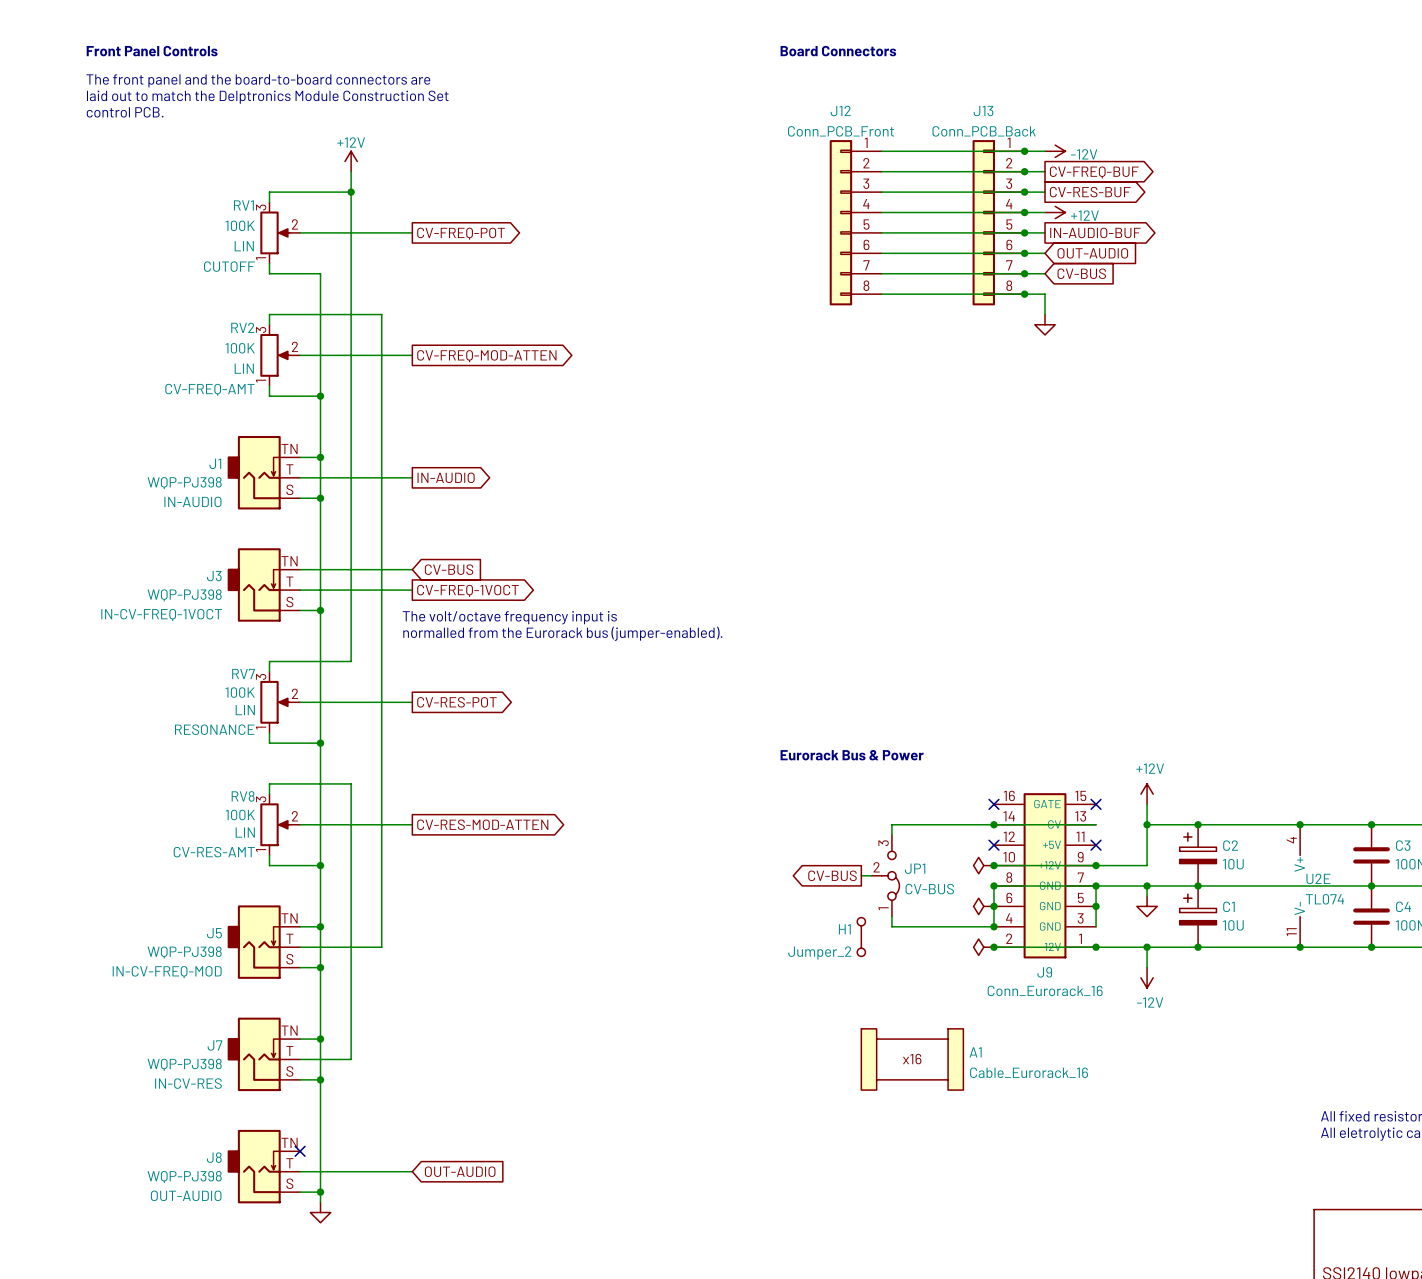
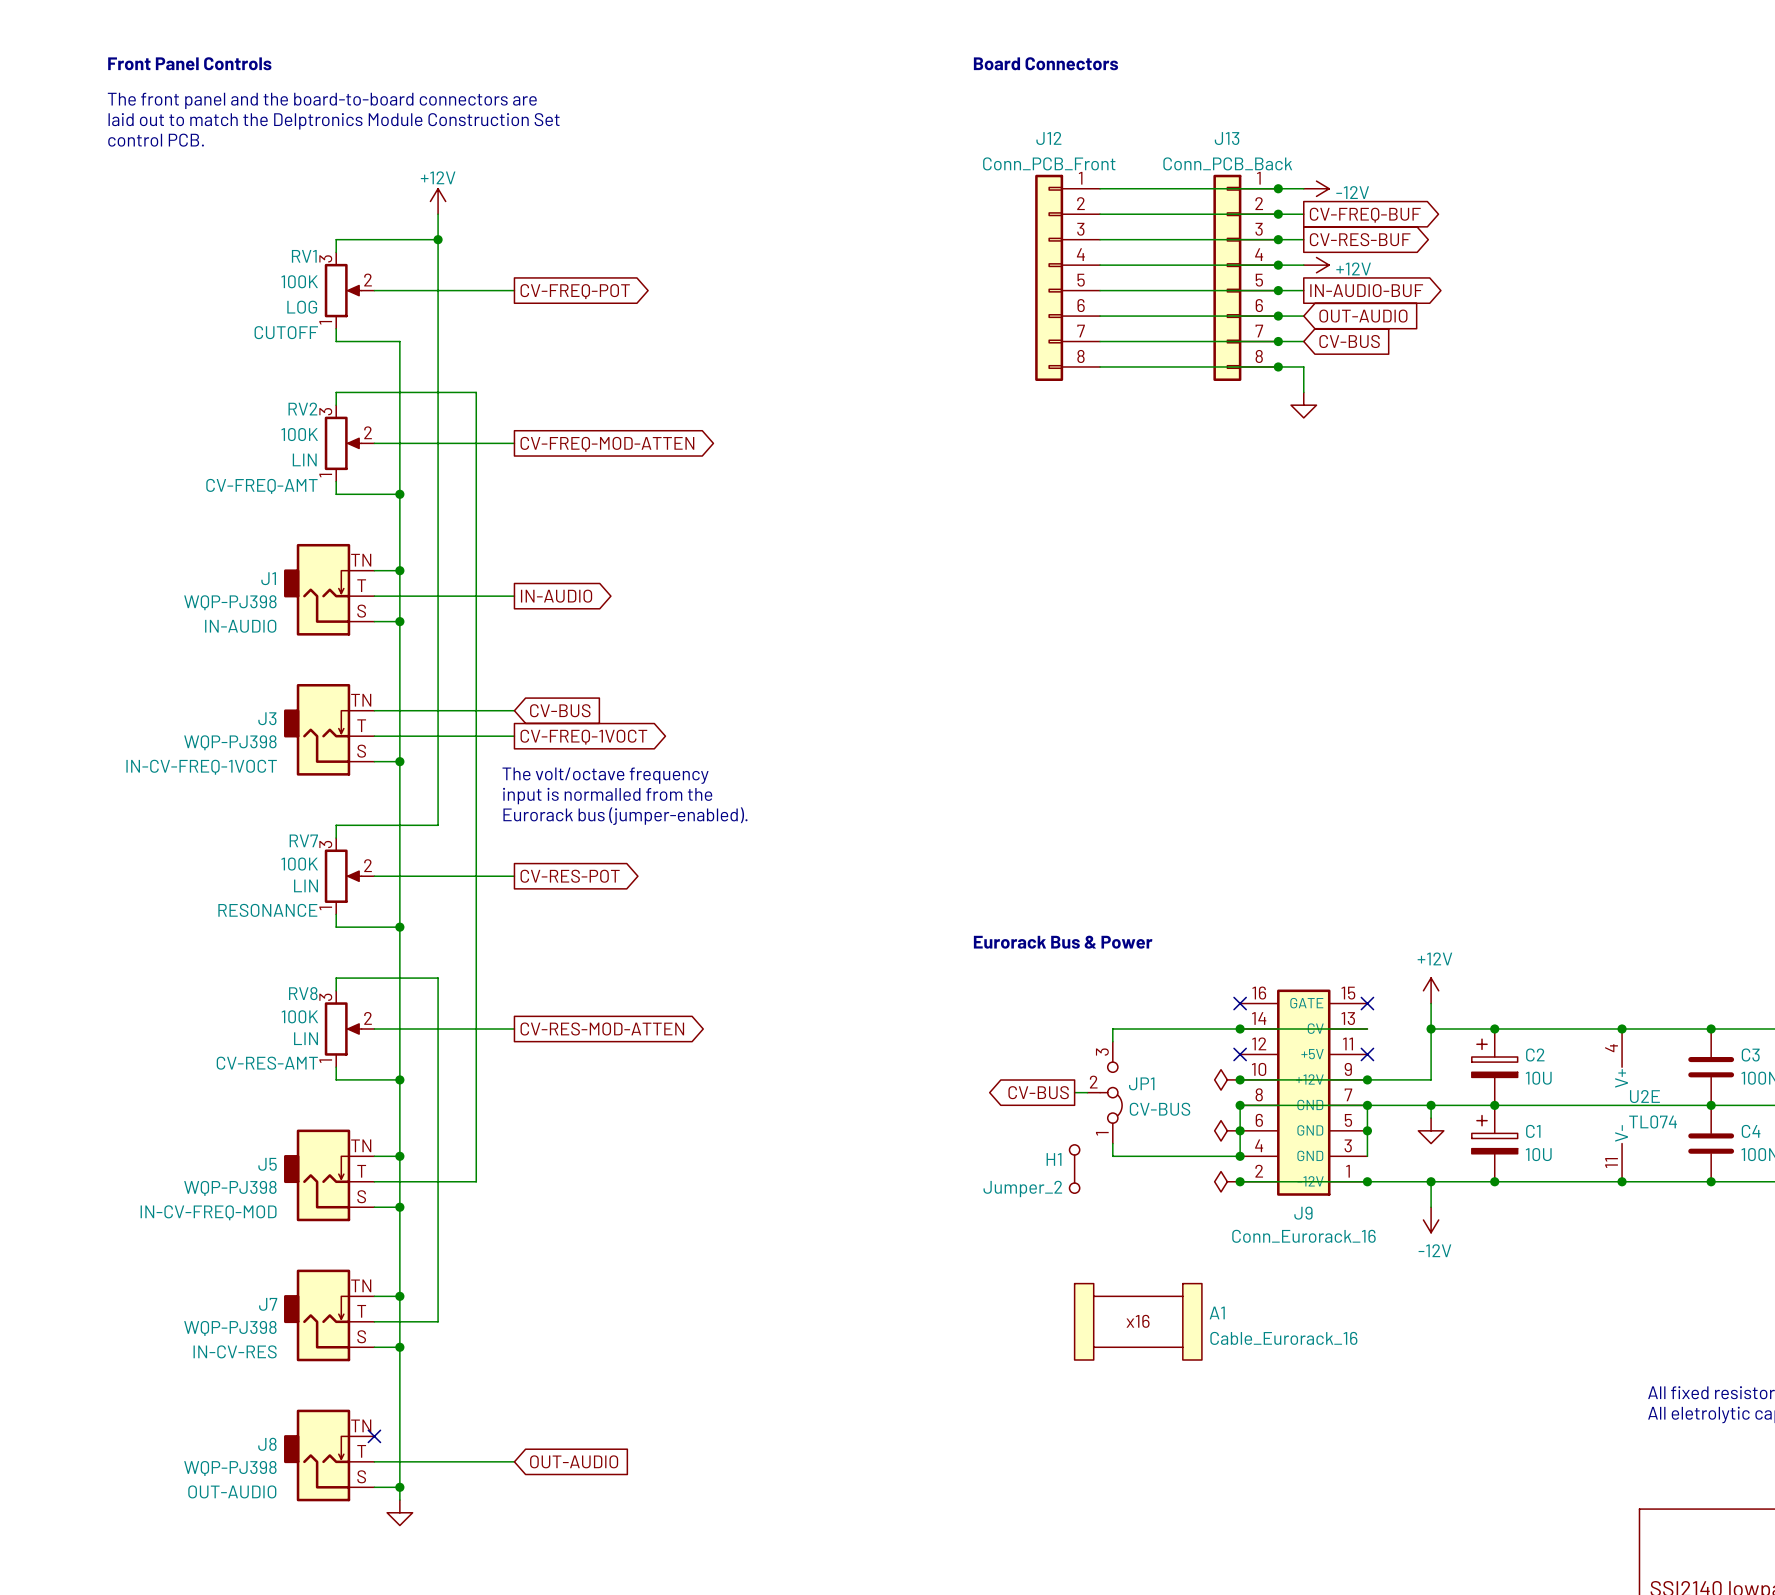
RV1 text: LIN (244, 246) -> LOG (302, 307)
text: The volt/octave frequency input is (509, 617) -> The volt/octave frequency (605, 775)
text: normalled from the Eurorack bus (jumper-enabled). (562, 633) -> input is normalled from the (607, 796)
text: none -> Eurorack bus (jumper-enabled). (625, 816)

